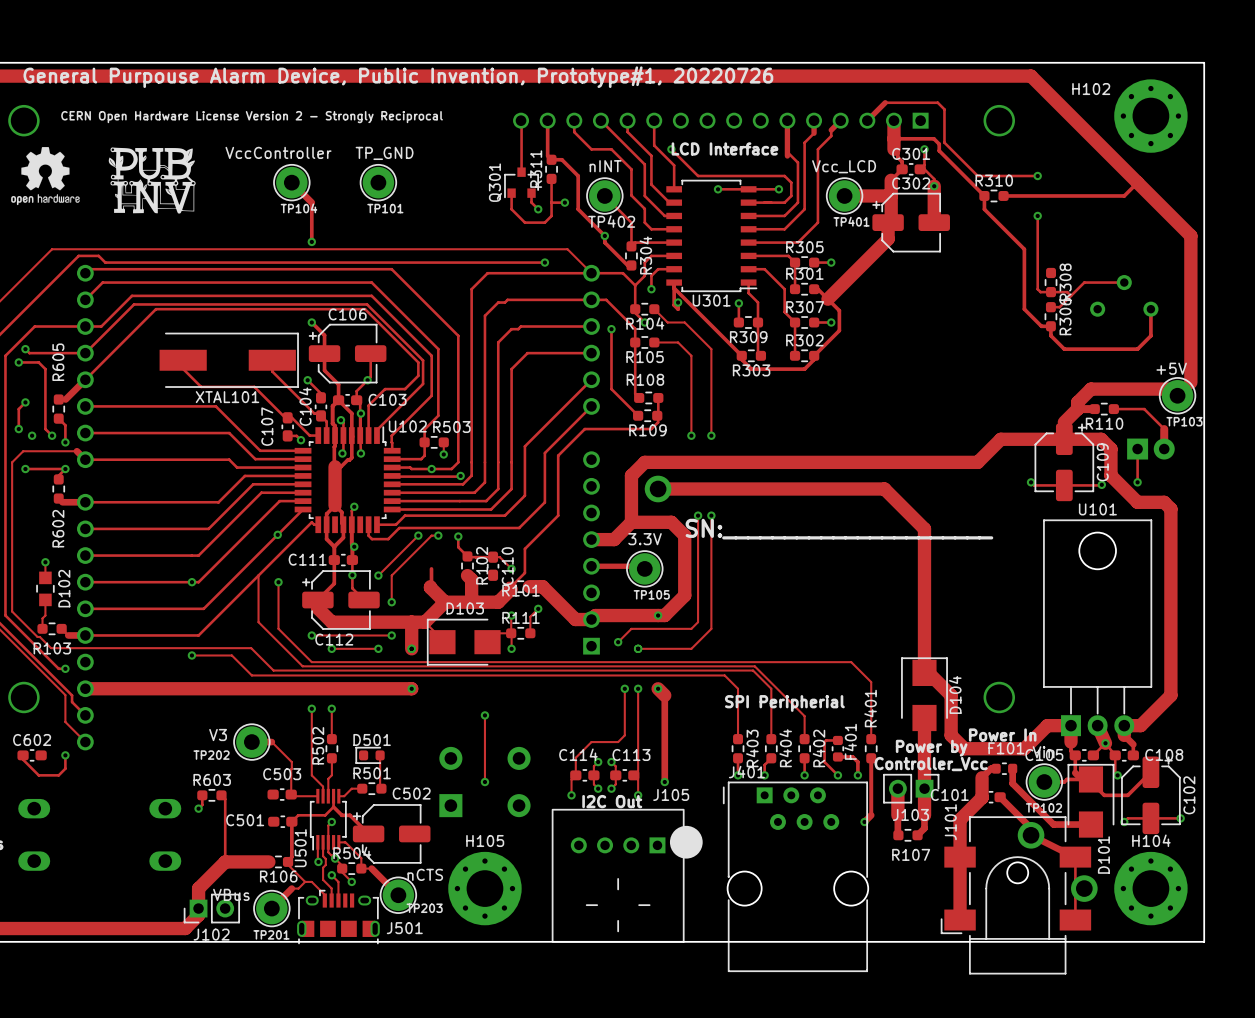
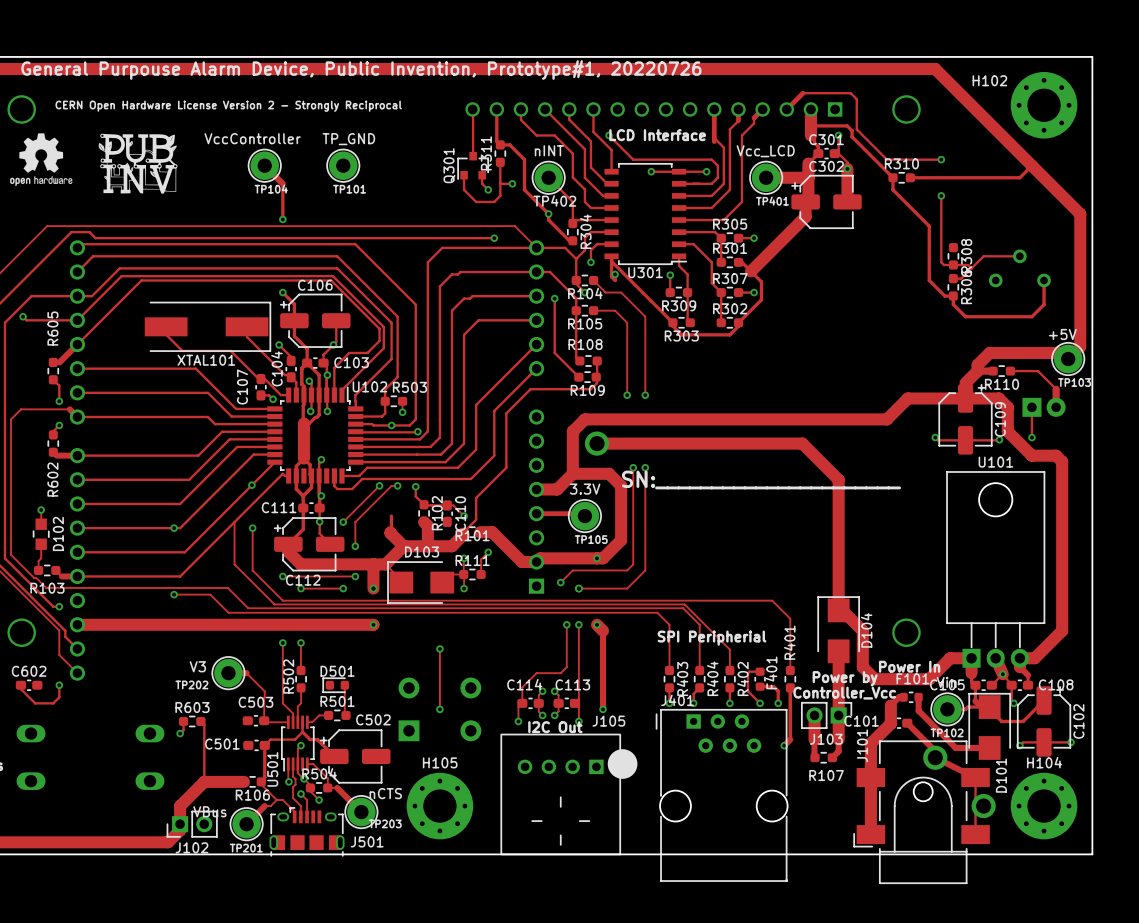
track: (18, 362) (38, 362) (45, 369) (45, 429) (52, 435) -> none
via: (18, 362) -> none
track: (25, 402) (18, 409) (18, 429) -> none
via: (25, 402) -> none
via: (18, 429) -> none
via: (32, 435) -> none
via: (52, 435) -> none
track: (25, 469) (65, 469) -> none
via: (25, 469) -> none

